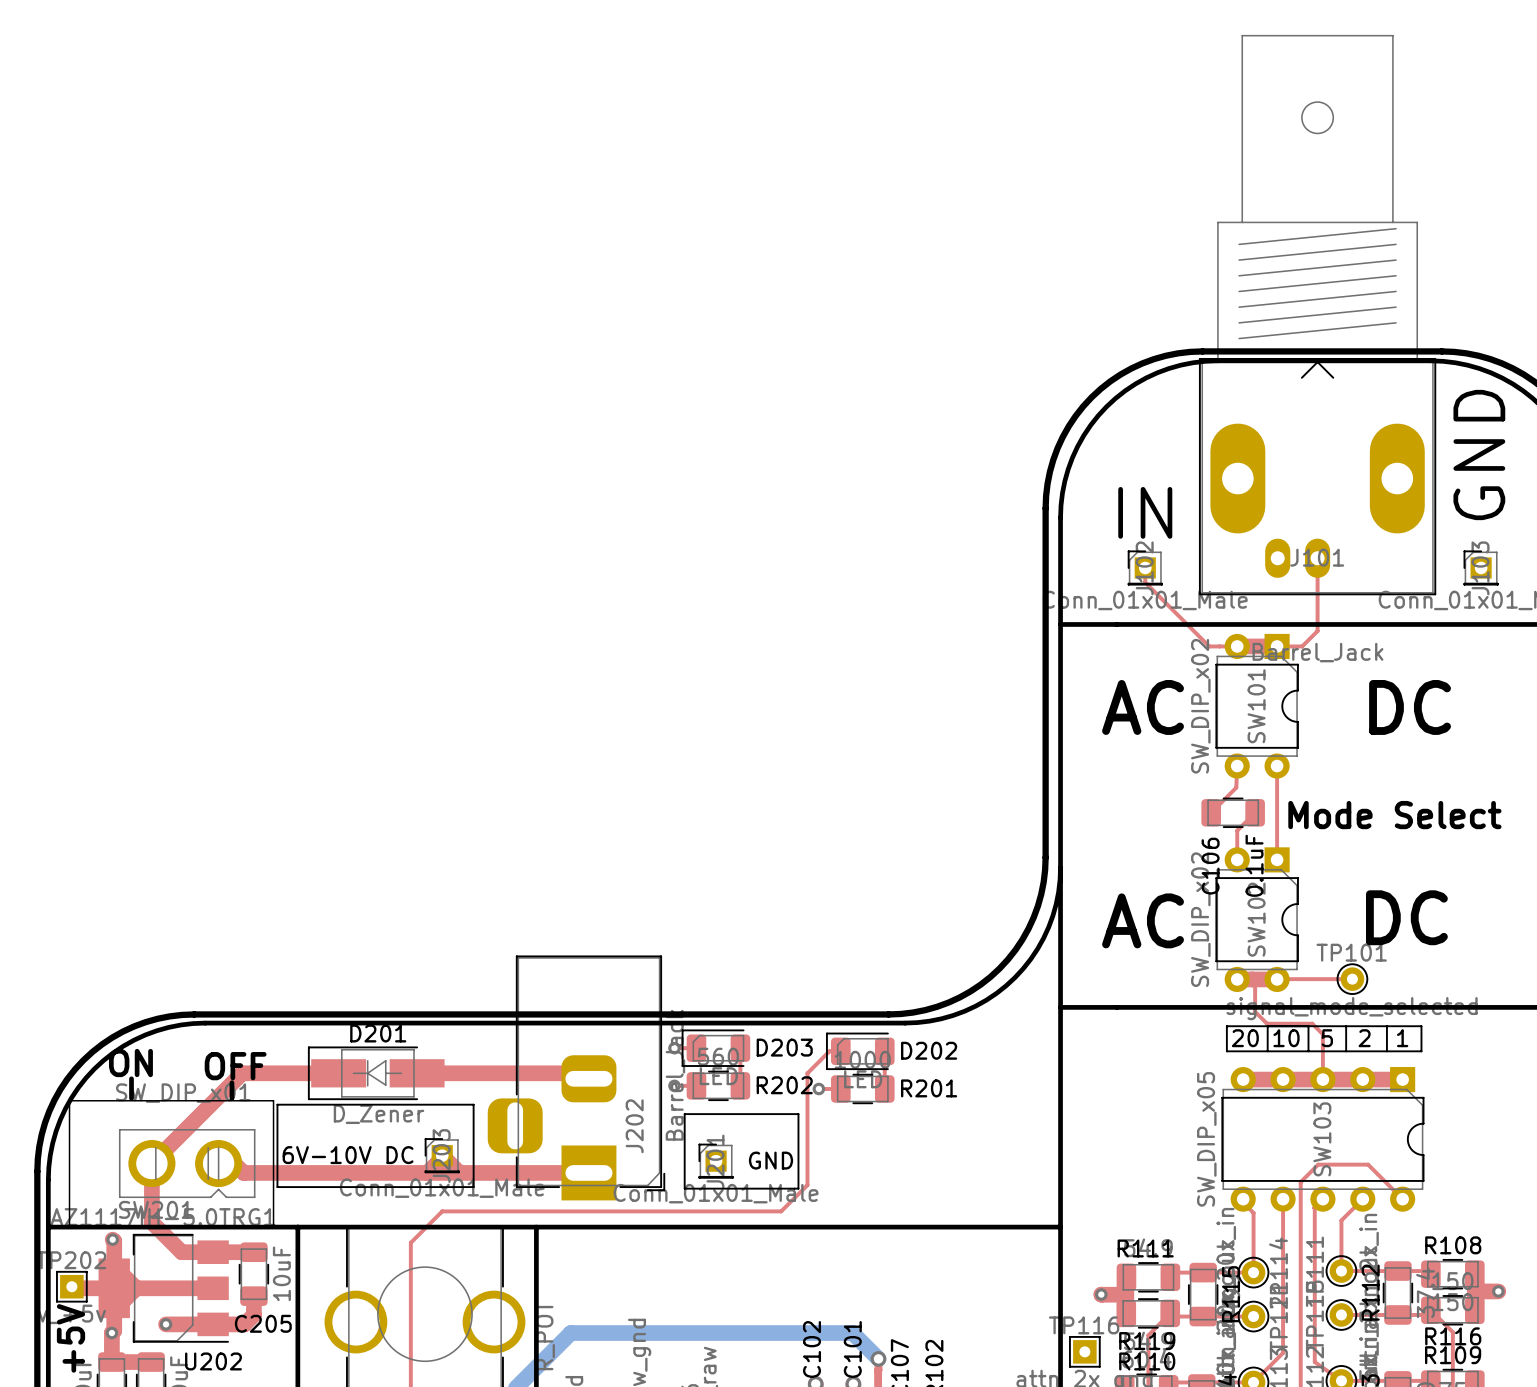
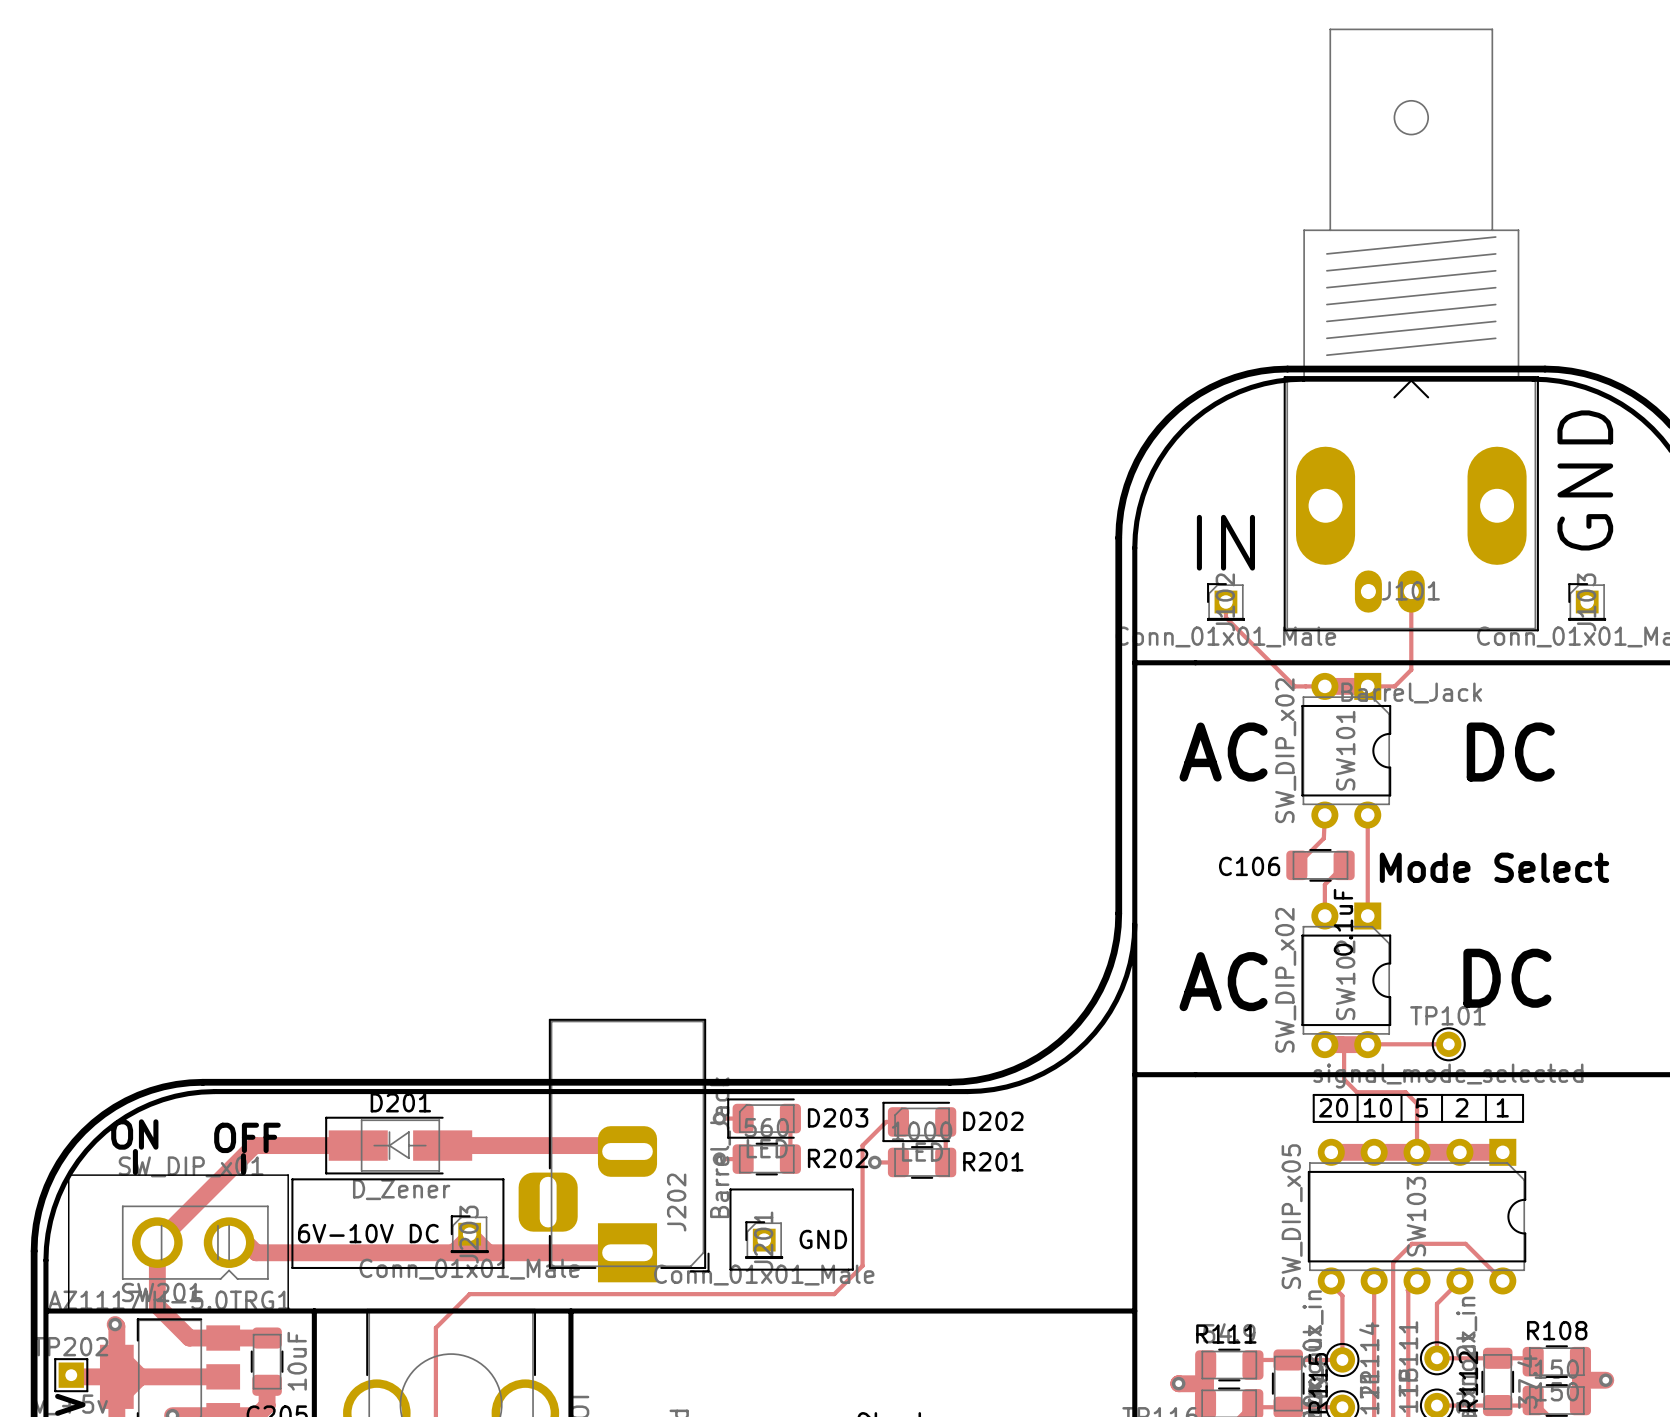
C106 name rotation: 0° (1210, 866) -> 90° clockwise (1249, 866)

